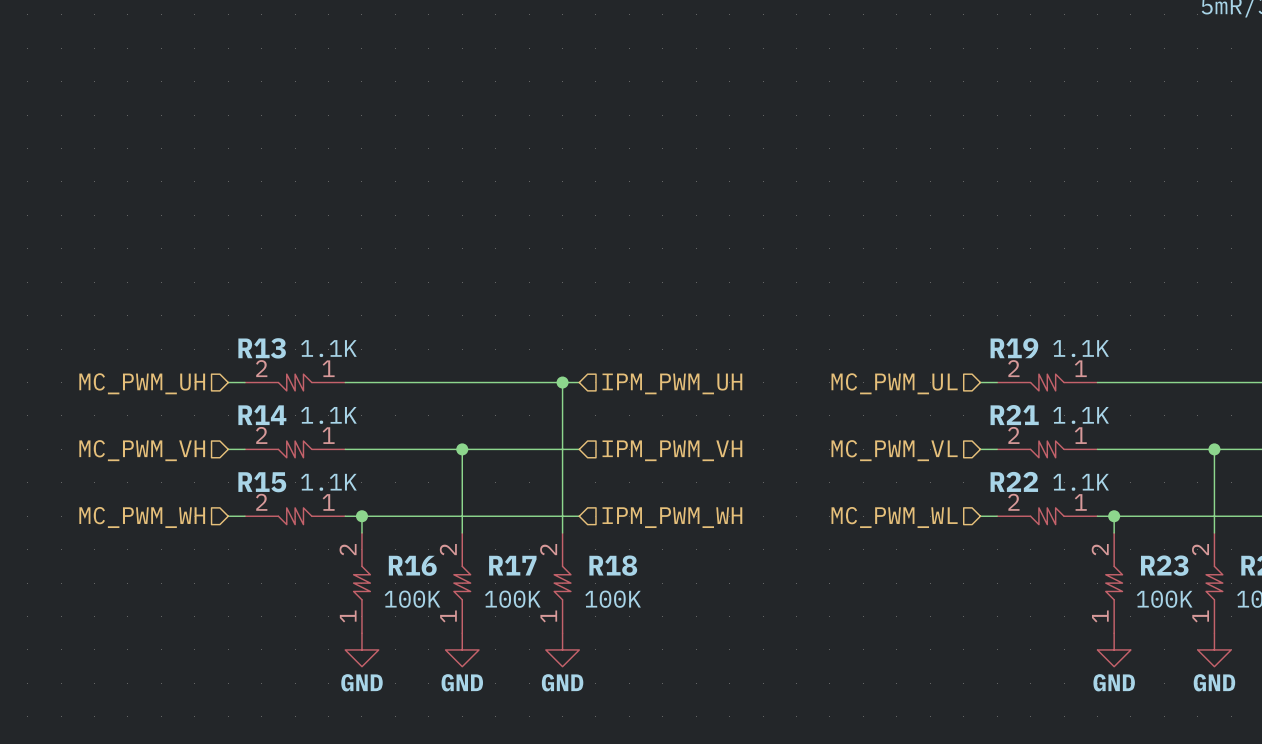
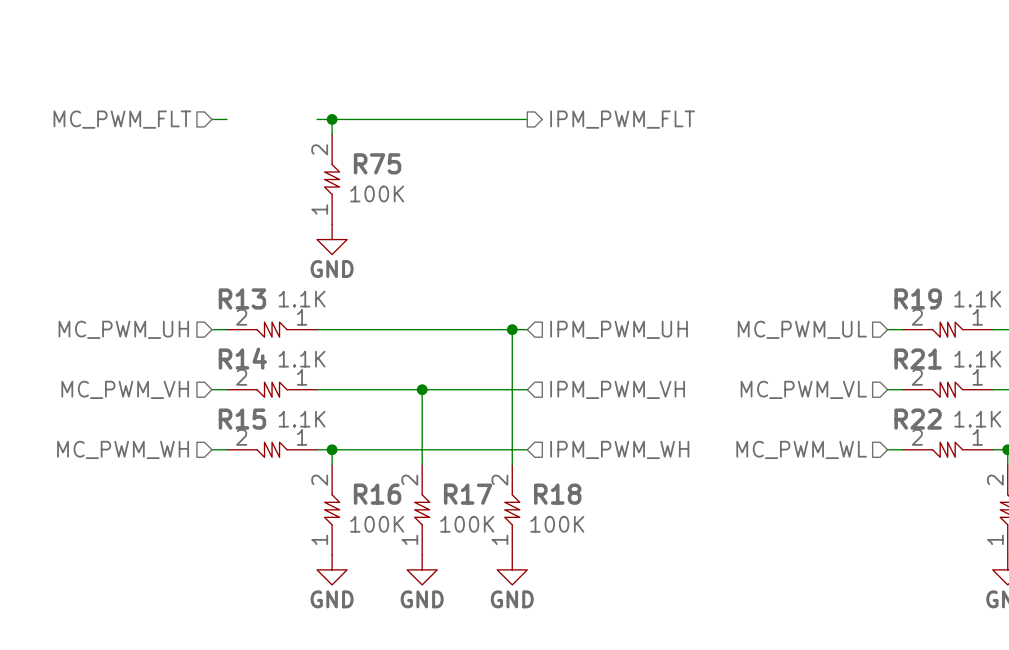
wire: none -> (211, 119) (226, 119)
wire: none -> (317, 119) (527, 119)
wire: none -> (332, 119) (332, 134)
junction: none -> (332, 119)
hierarchical label: none -> MC_PWM_FLT (122, 119)
hierarchical label: none -> IPM_PWM_FLT (622, 119)
R75: none -> 100K (332, 179)
power symbol: none -> GND (332, 239)

